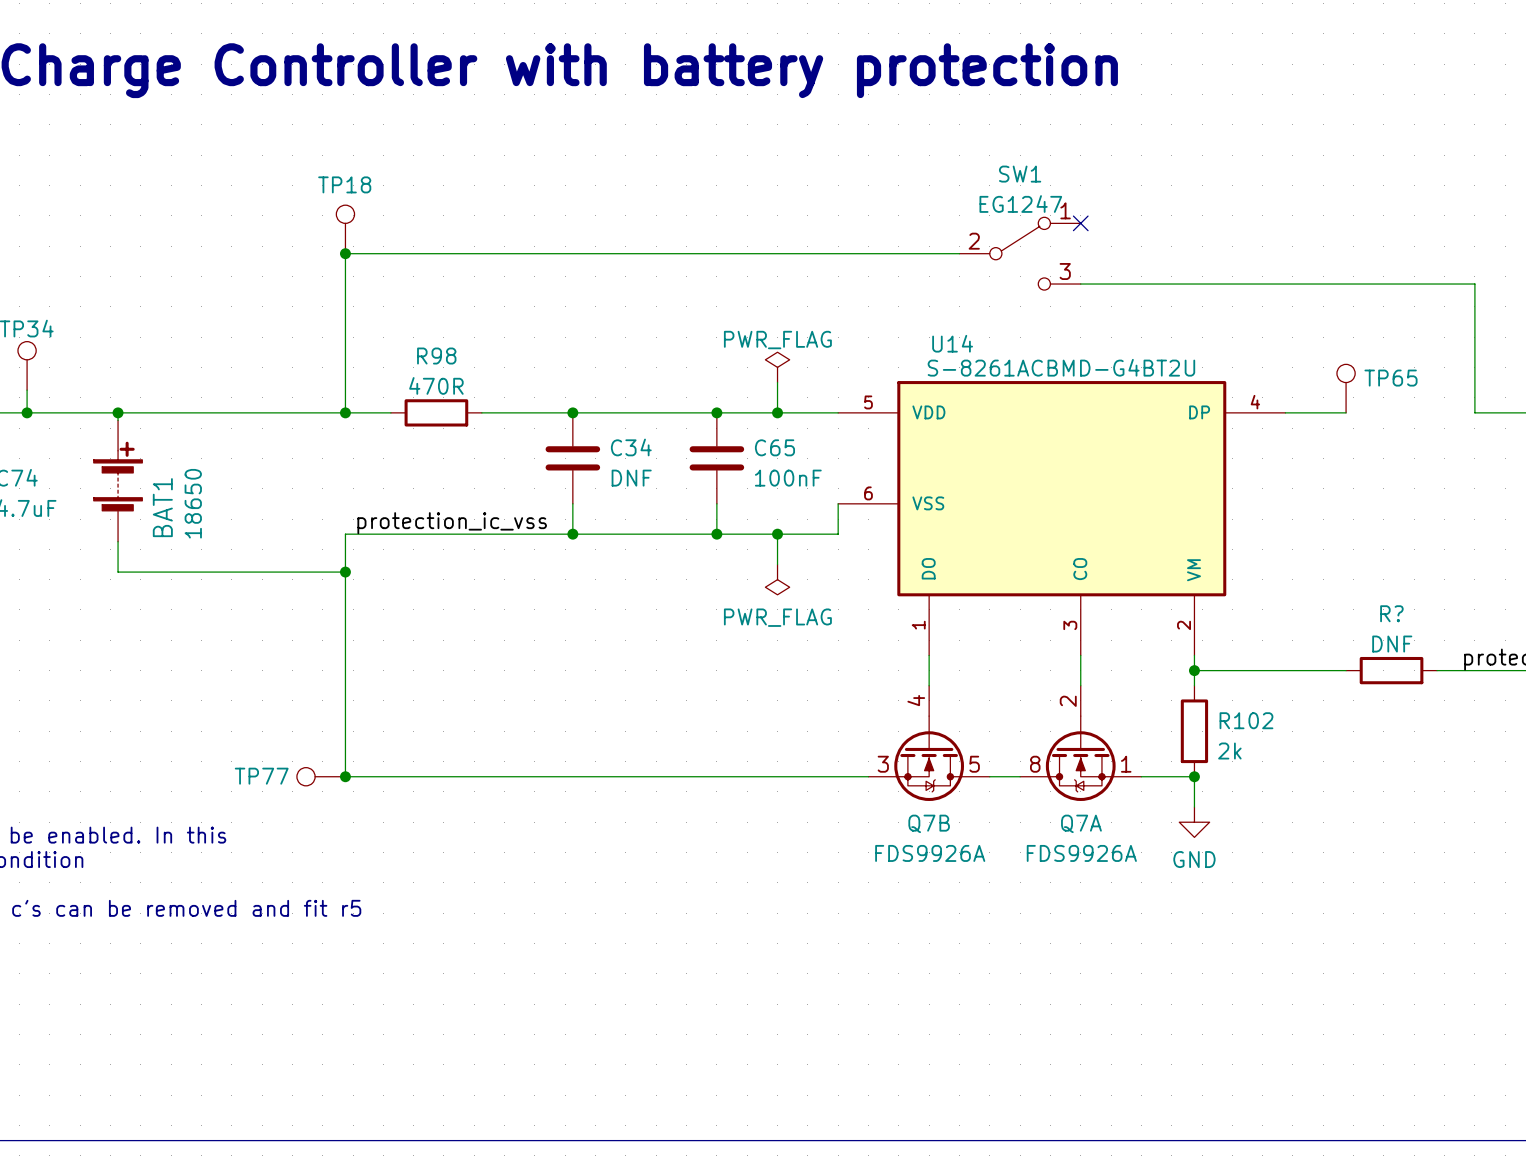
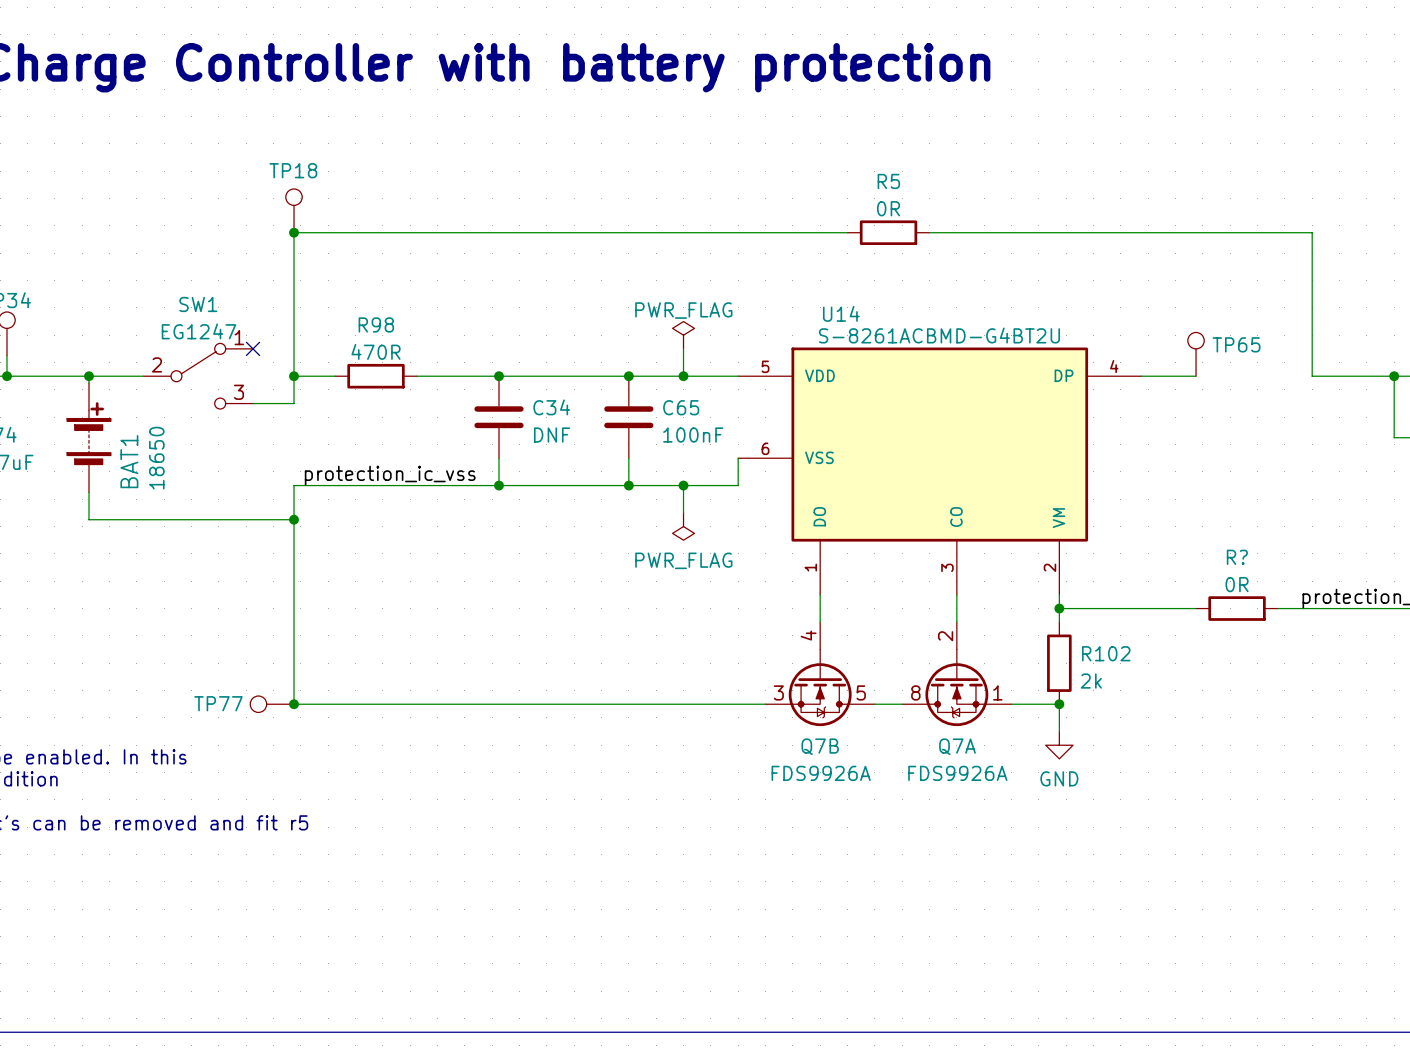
no-connect mark: (1080, 223) -> none
R5: none -> 0R (888, 232)
SW1 position: (1020, 253) -> (198, 376)
wire: (1080, 284) (1474, 284) -> (929, 232) (1312, 232) (1312, 260)
no-connect mark: none -> (253, 348)
wire: (178, 412) (345, 412) -> (253, 403) (294, 403) (294, 376)
R? value: DNF (1392, 644) -> 0R (1237, 584)

